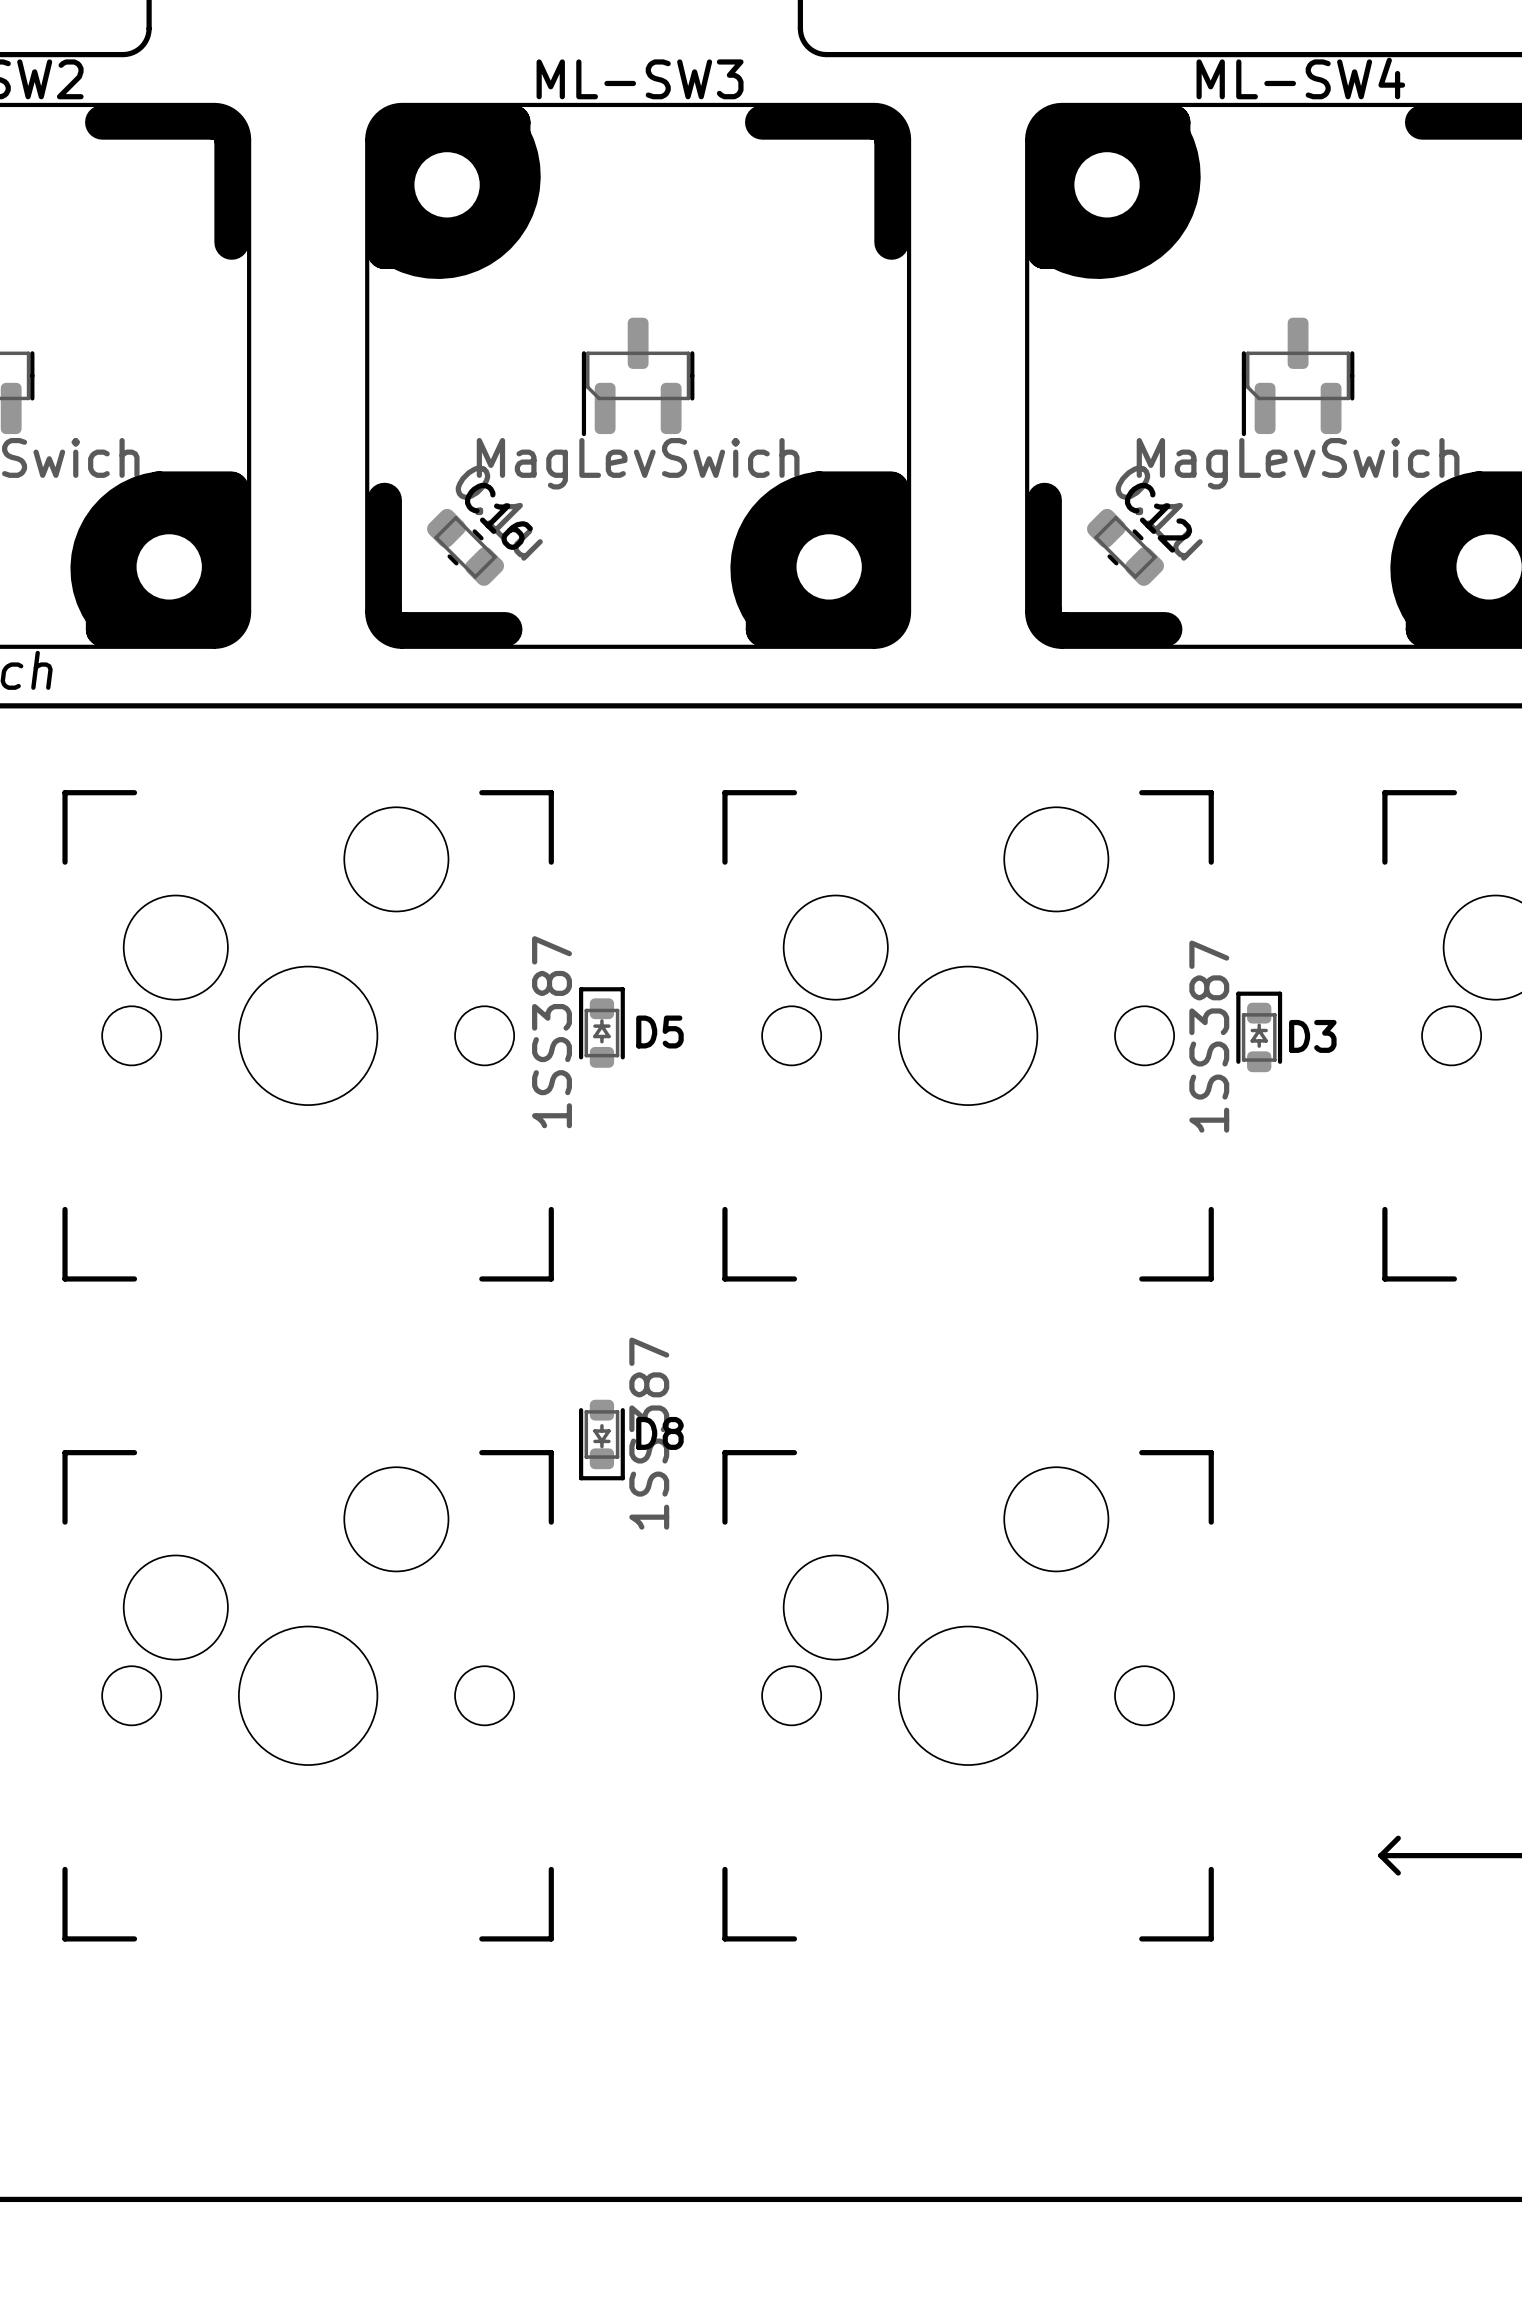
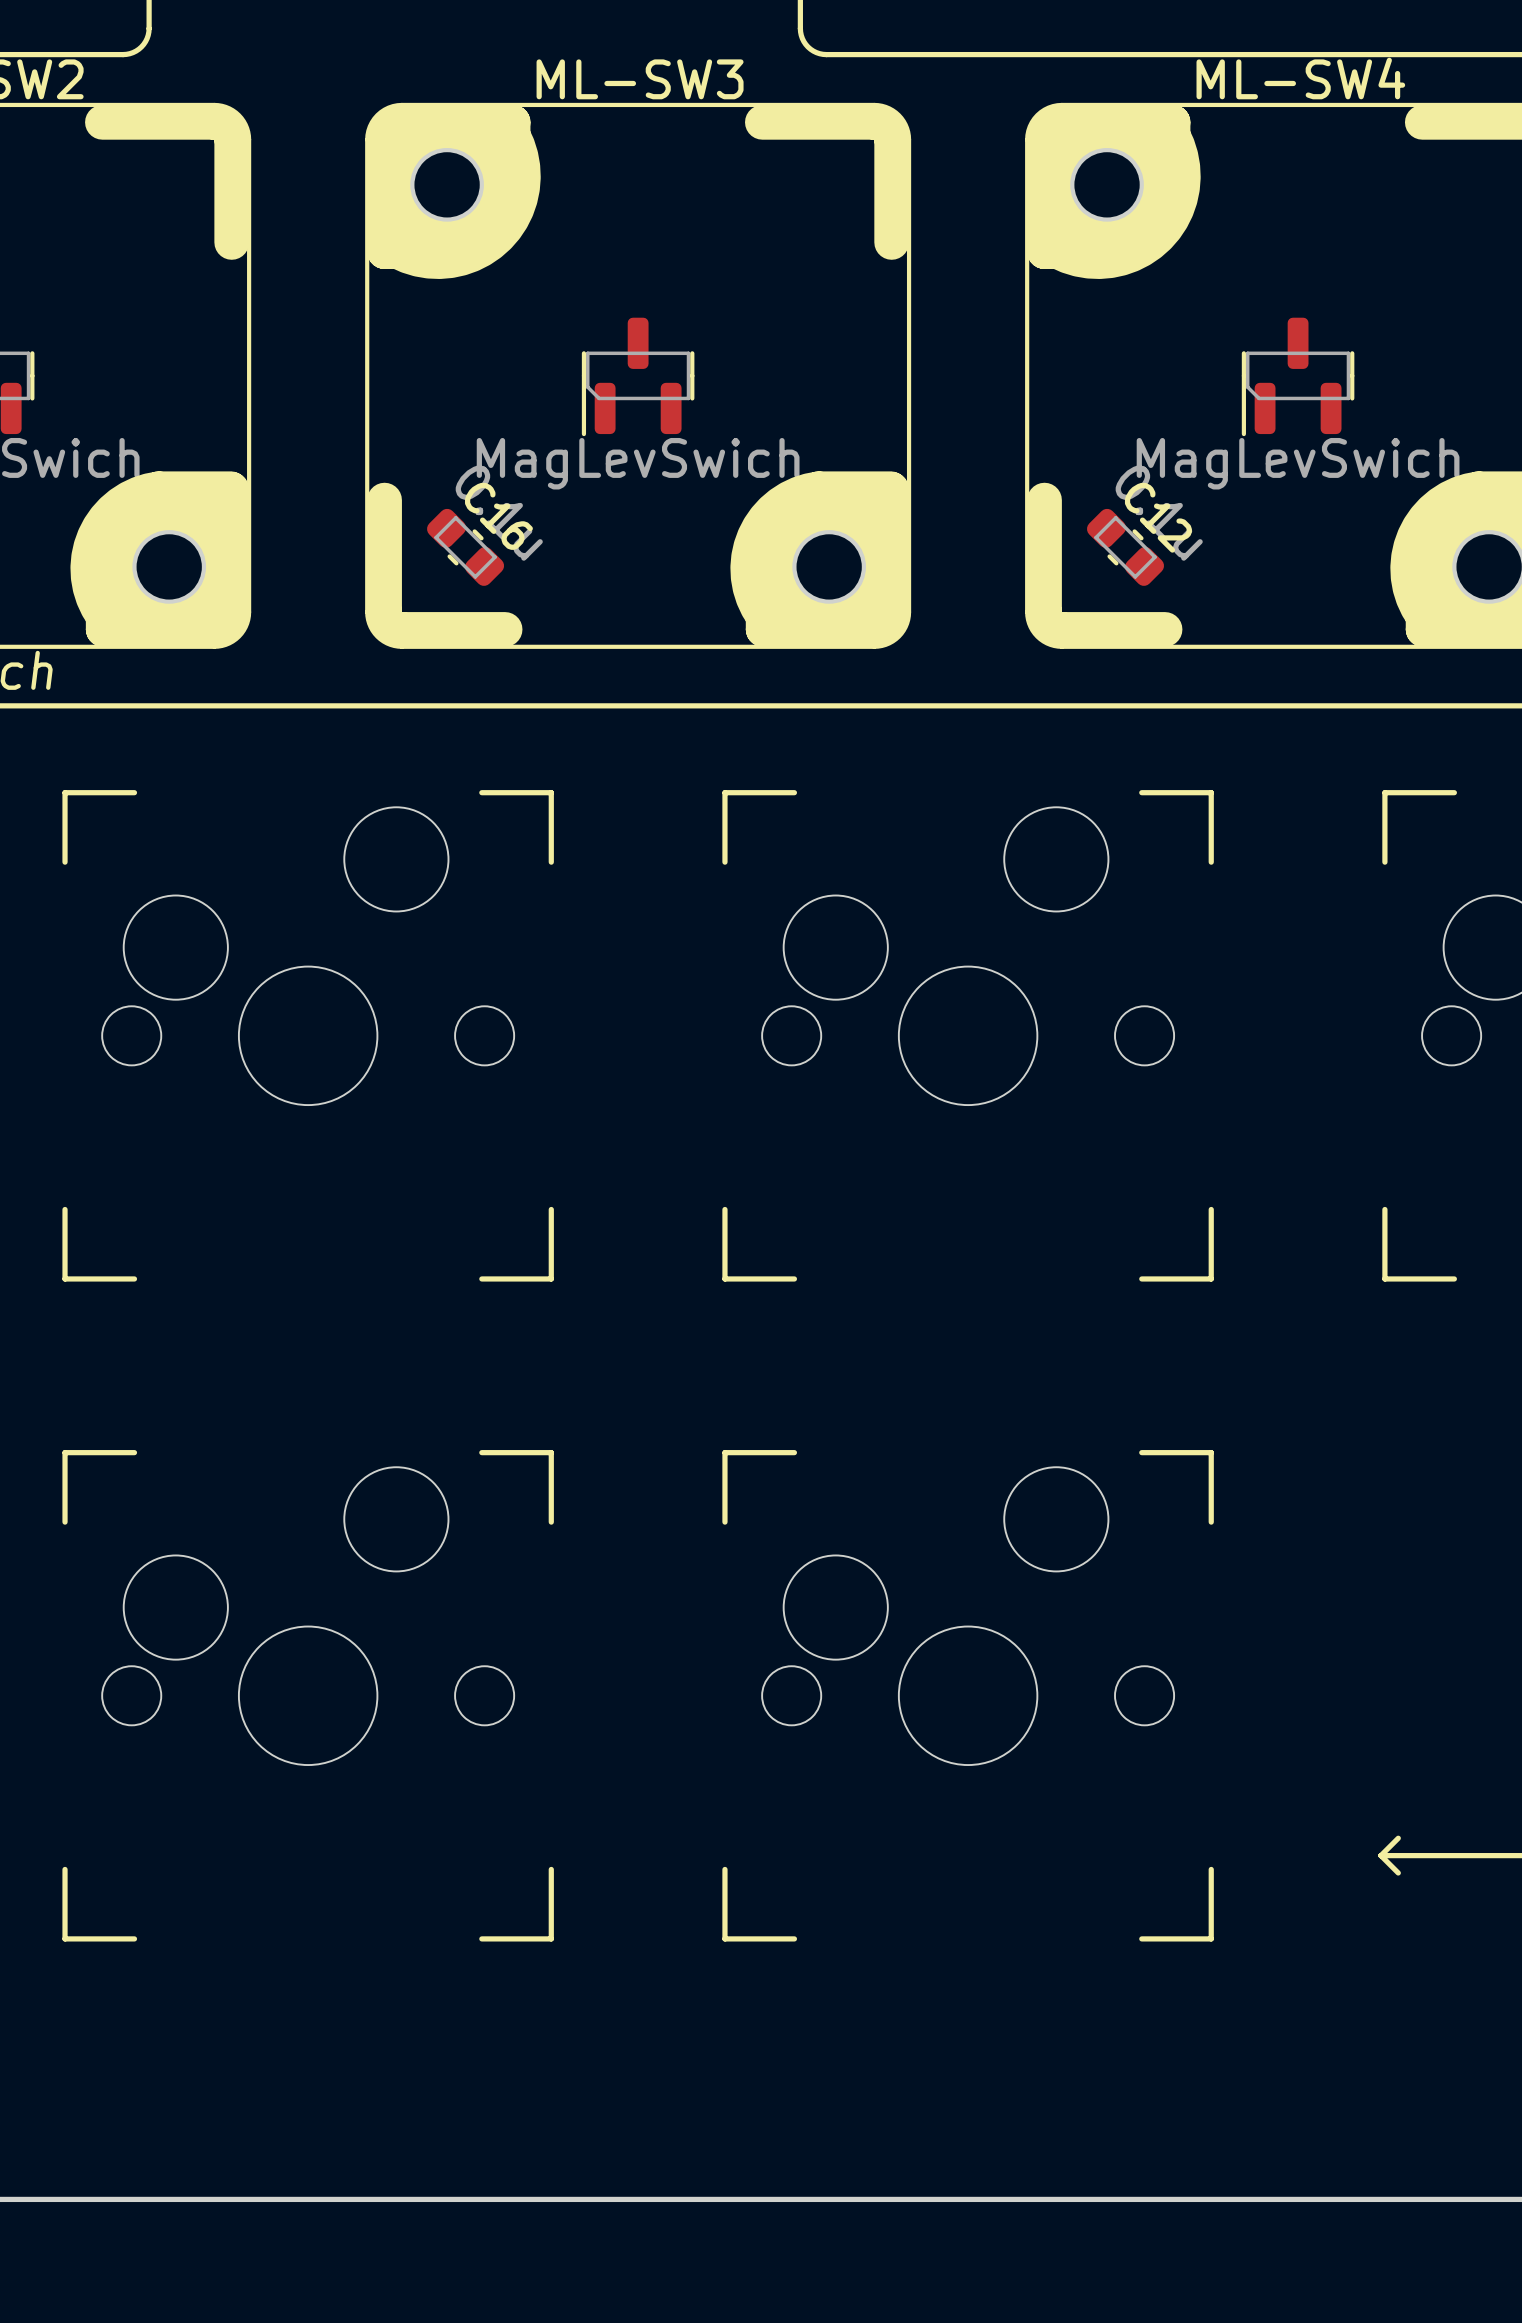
D5: 1SS387 (601, 1027) -> none
D3: 1SS387 (1259, 1031) -> none
D8: 1SS387 (601, 1440) -> none

